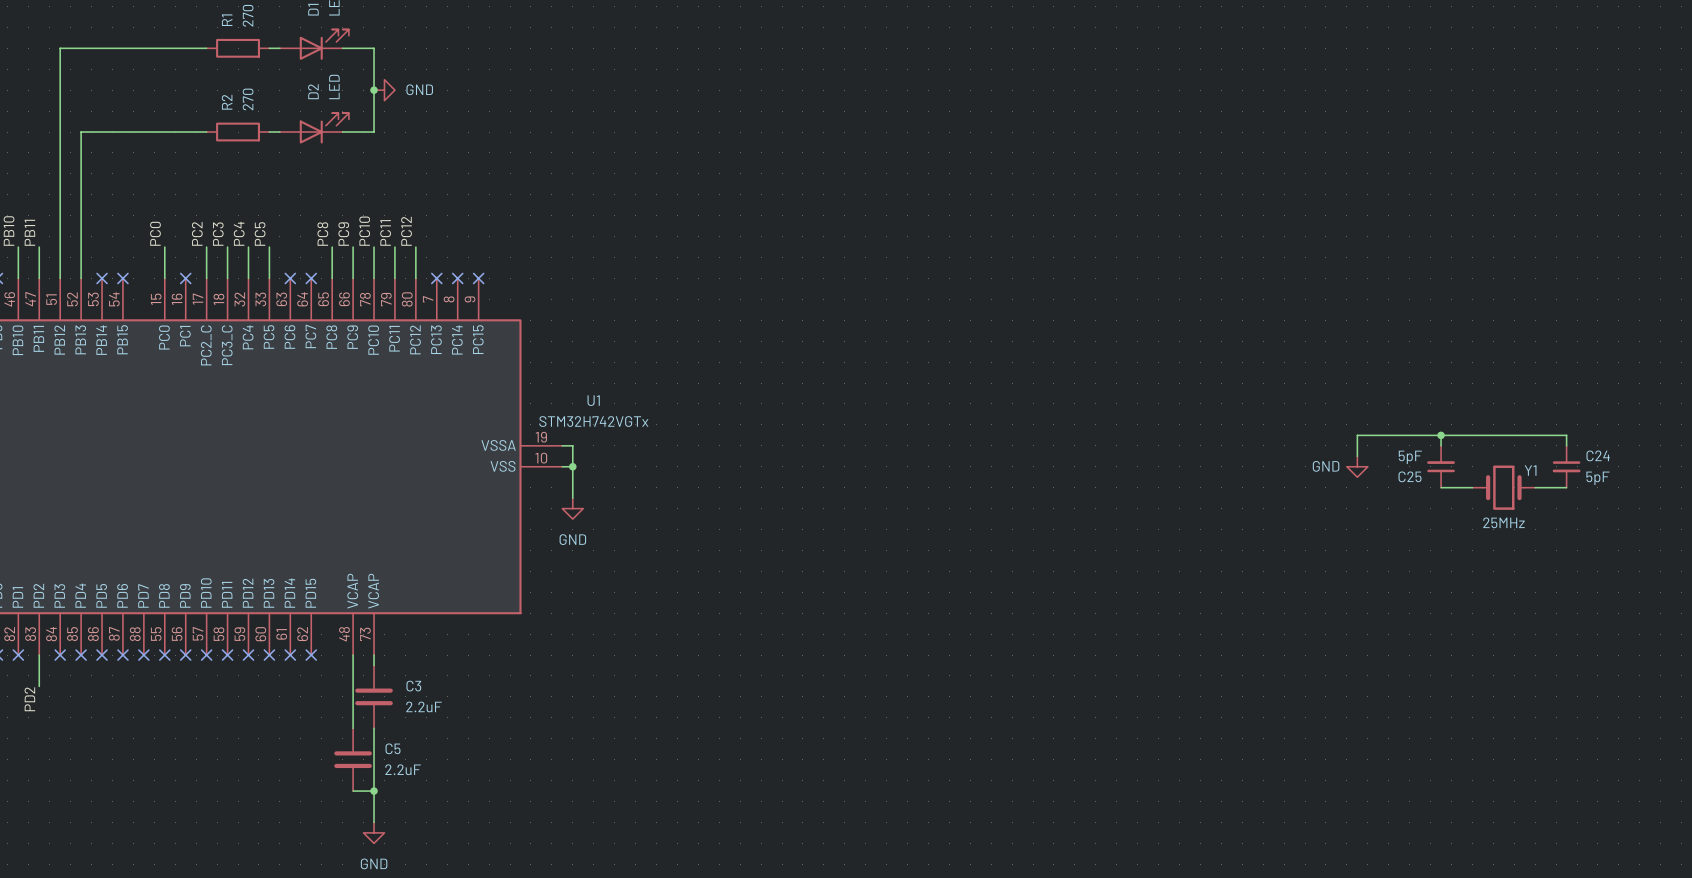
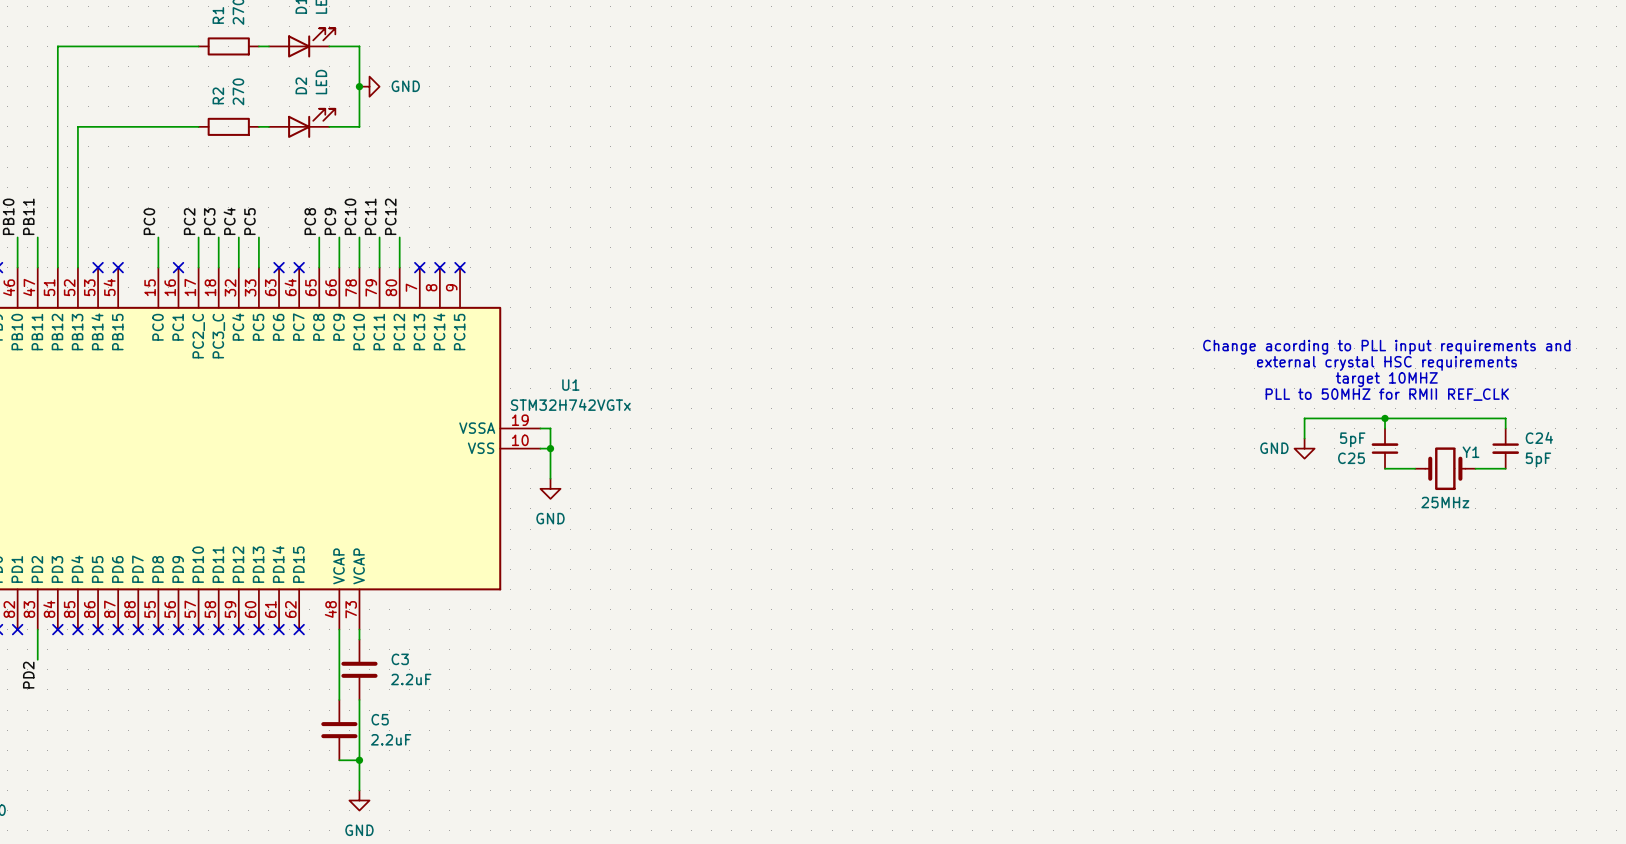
text: none -> Change acording to PLL input requirements and (1386, 347)
text: none -> external crystal HSC requirements (1387, 363)
text: none -> target 10MHZ (1386, 379)
text: none -> PLL to 50MHZ for RMII REF_CLK (1387, 394)

